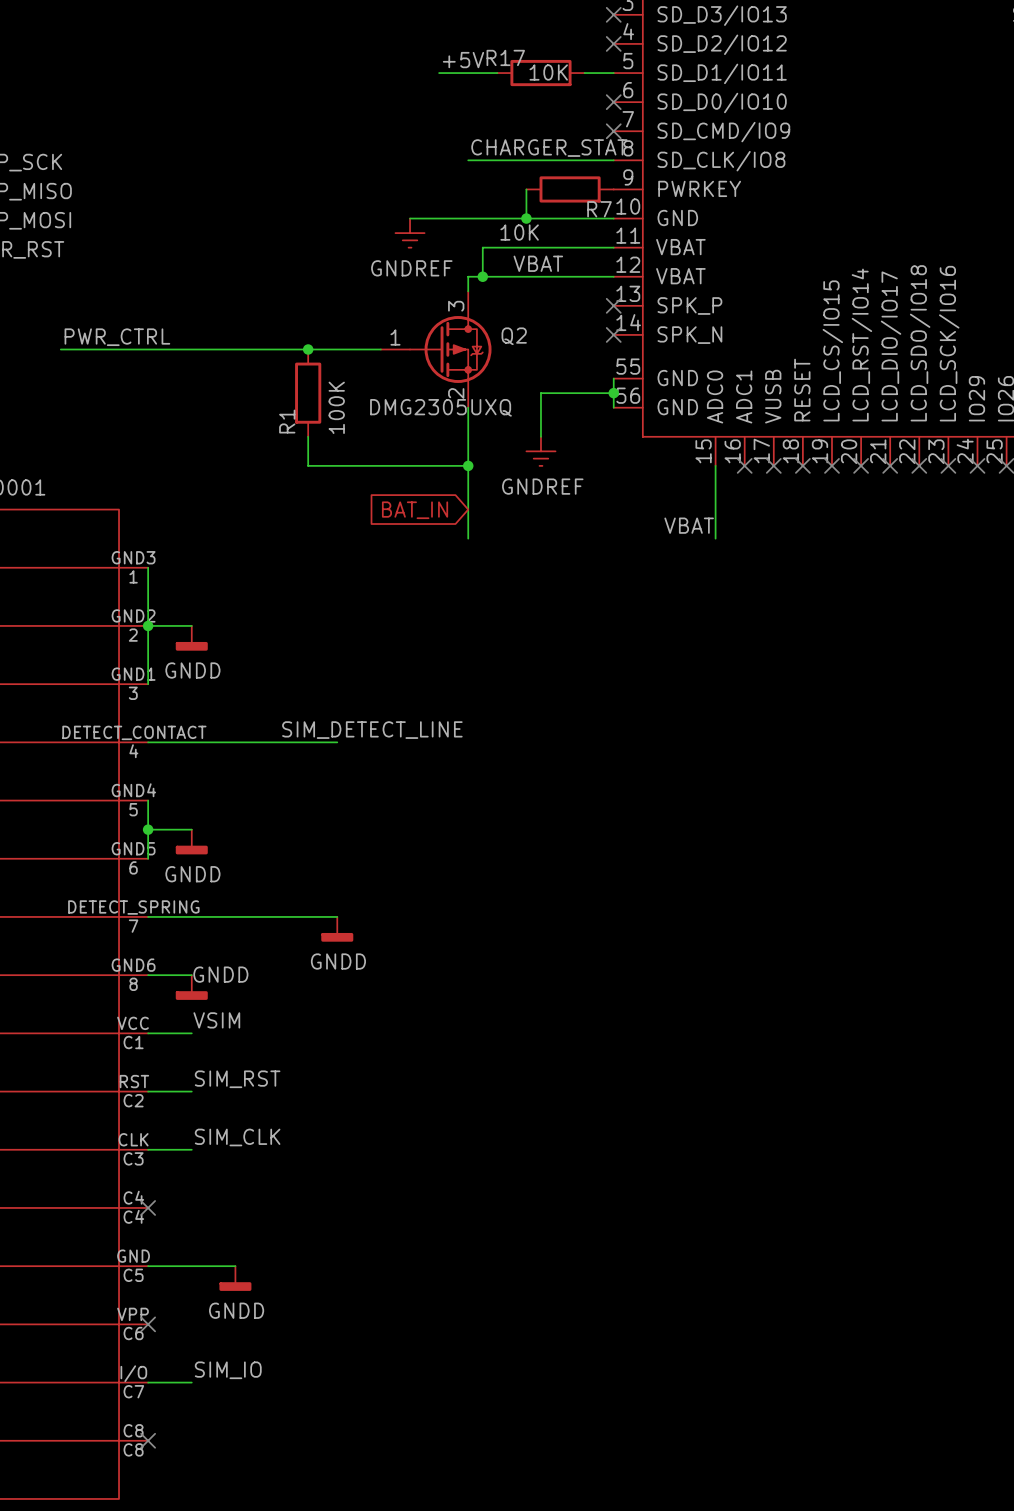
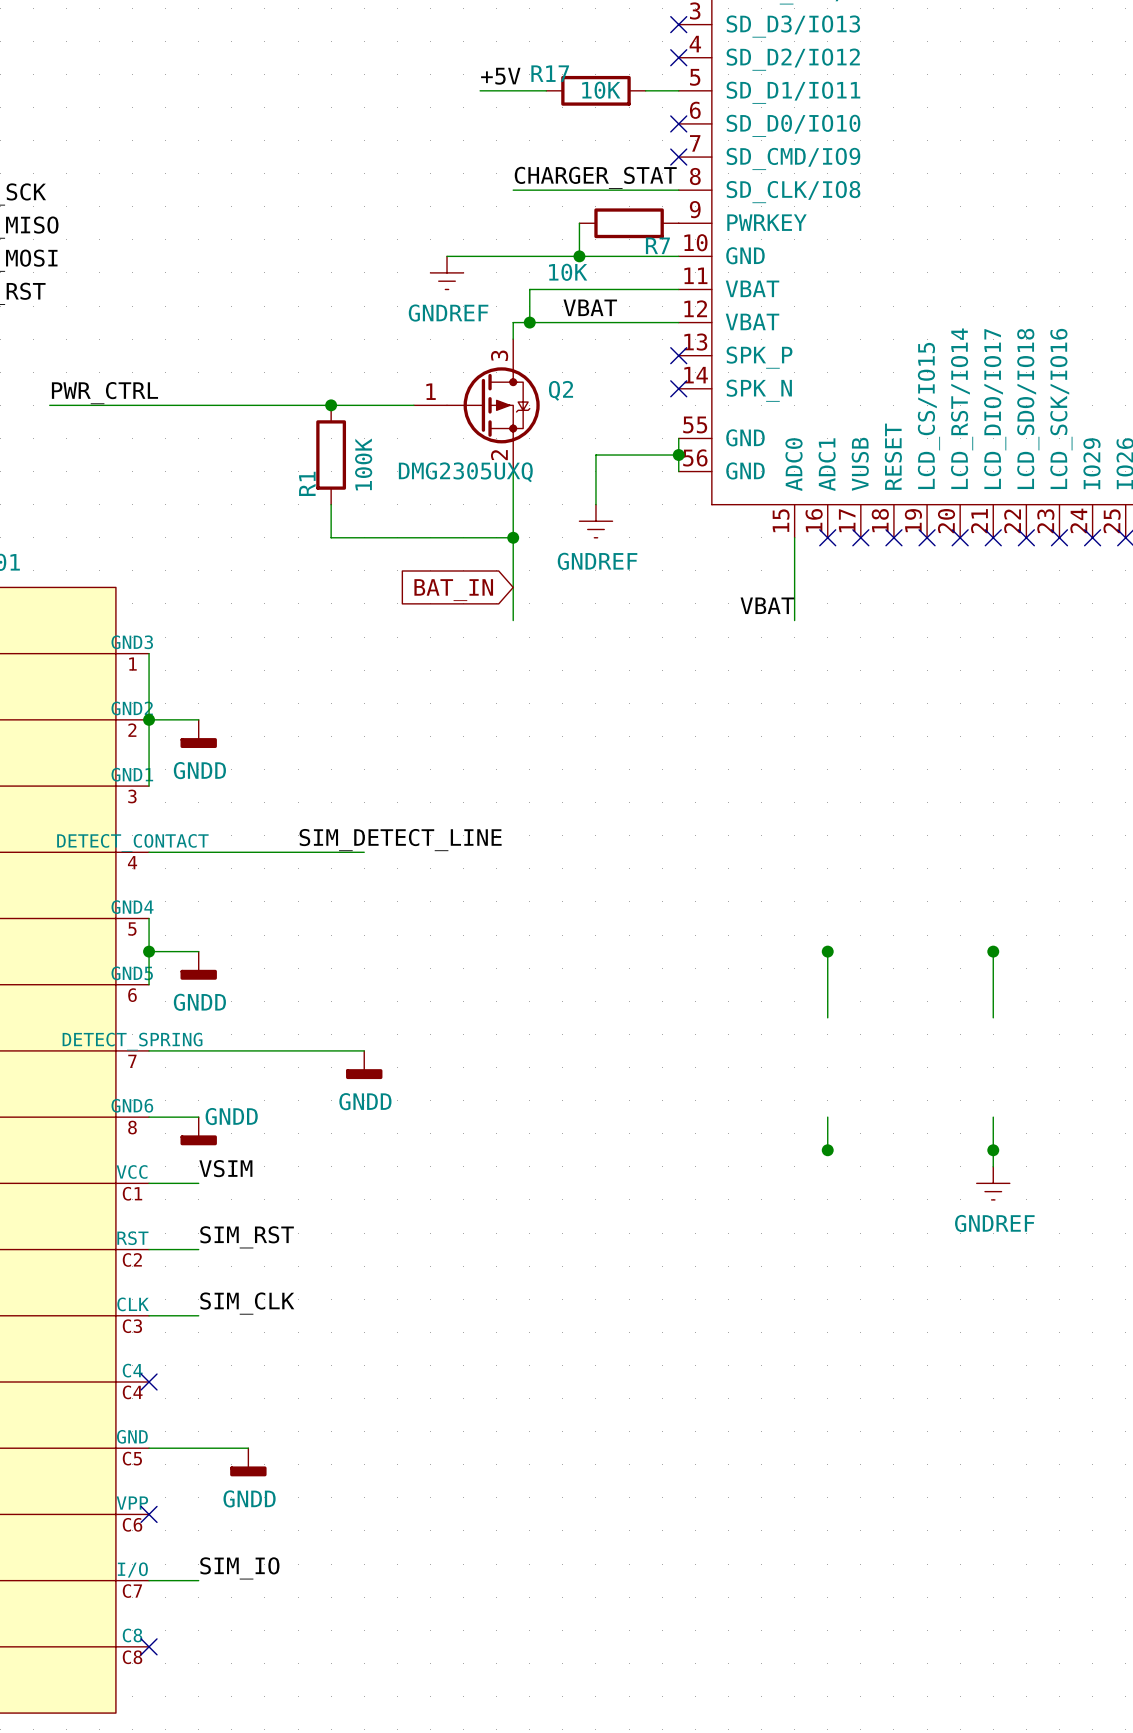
wire: none -> (827, 951) (827, 1017)
junction: none -> (827, 951)
wire: none -> (993, 951) (993, 1017)
junction: none -> (993, 951)
wire: none -> (827, 1117) (827, 1150)
wire: none -> (993, 1117) (993, 1166)
junction: none -> (827, 1150)
junction: none -> (993, 1150)
power symbol: none -> GNDREF (993, 1183)

